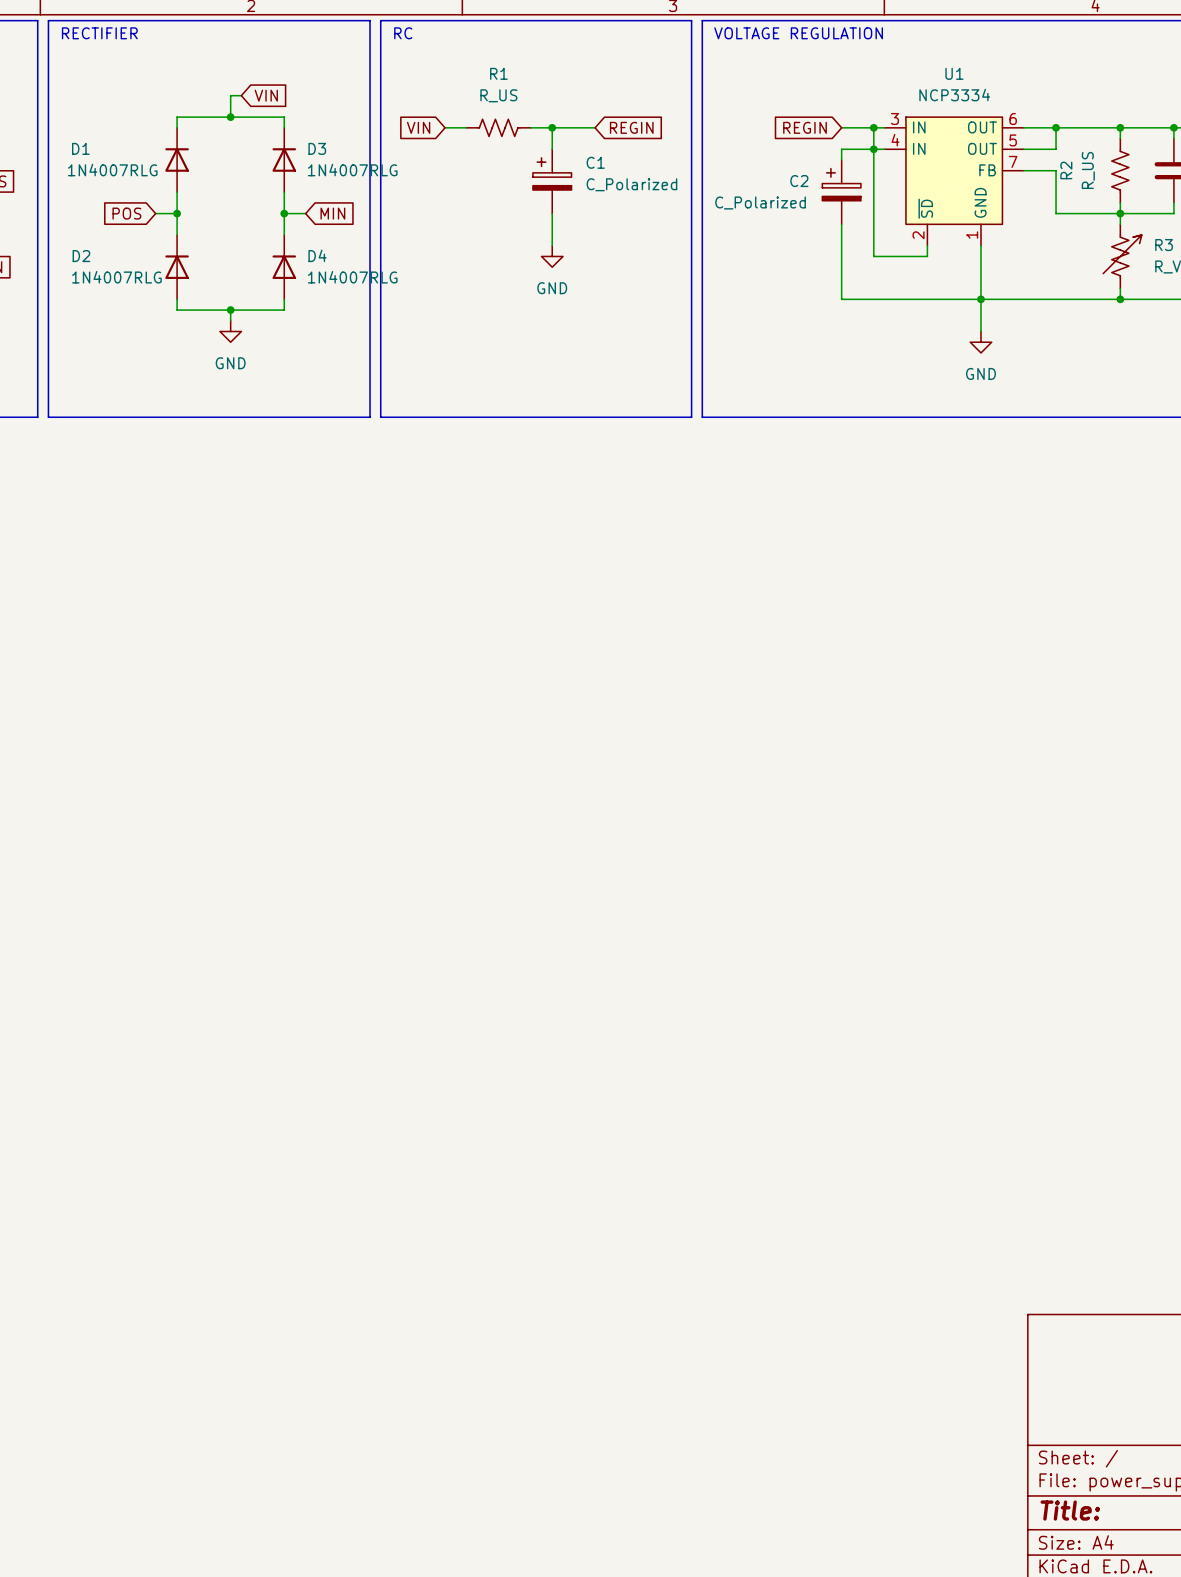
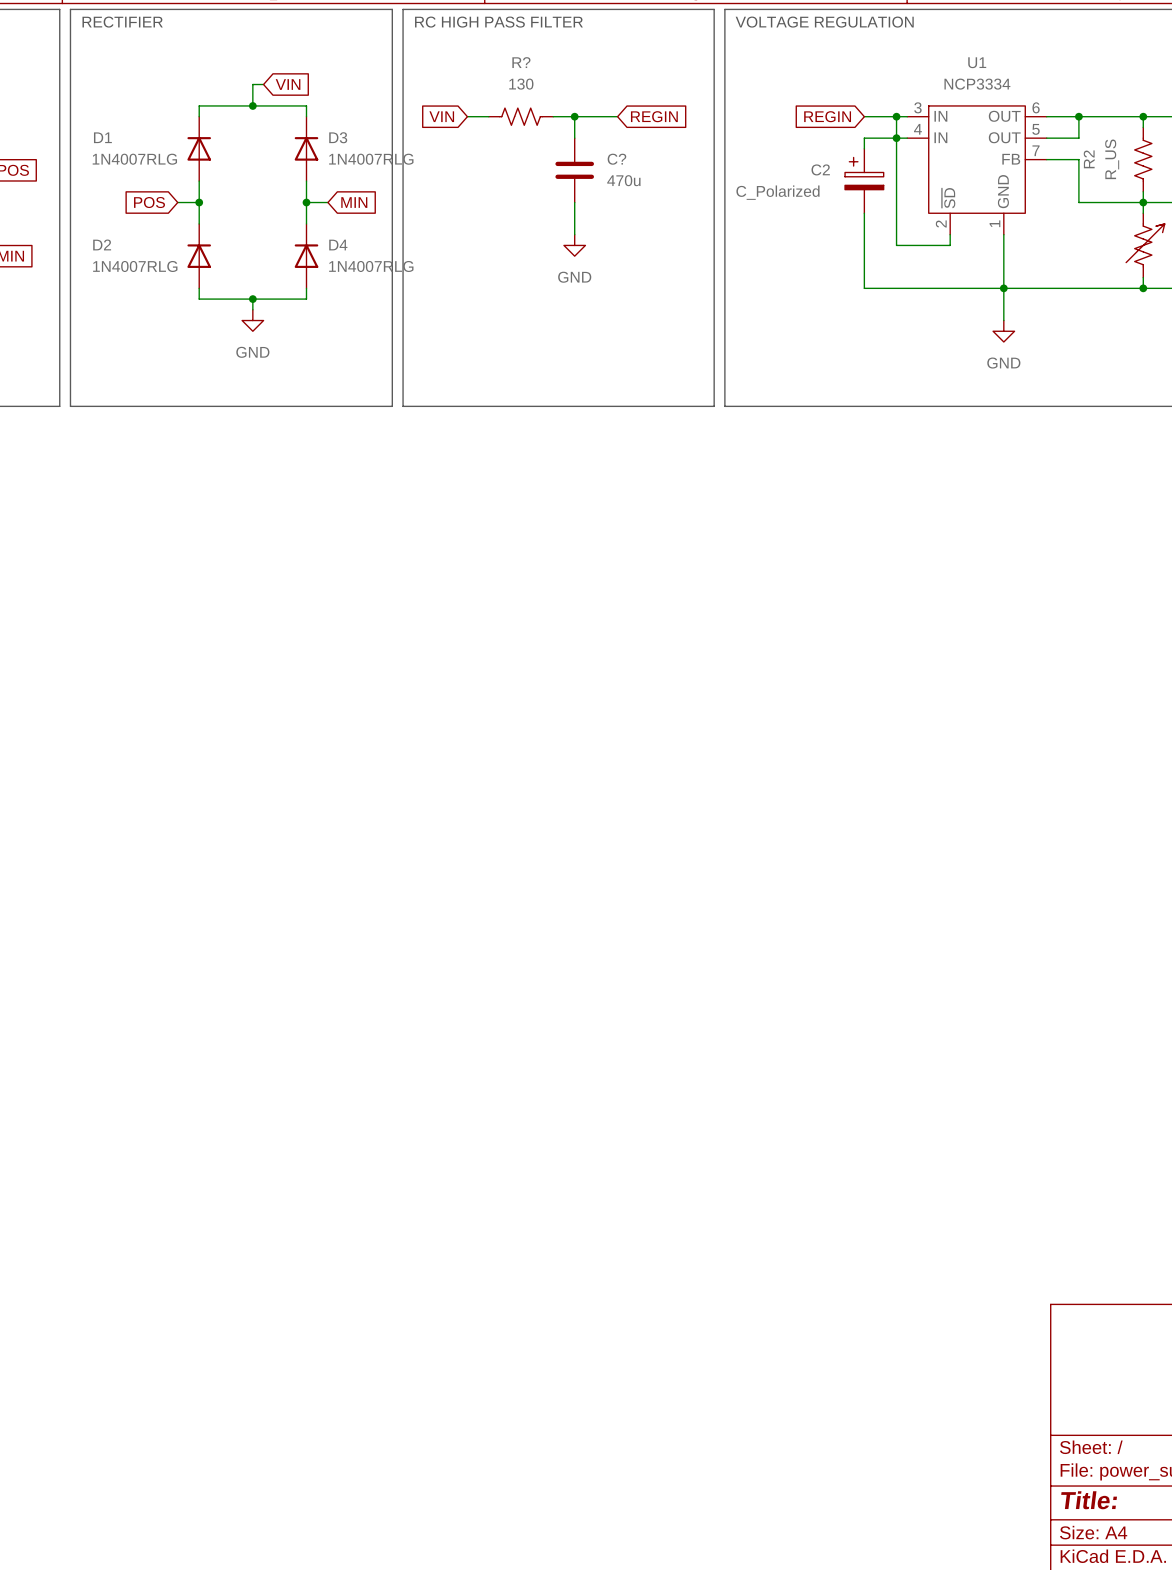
text: RC (403, 33) -> RC HIGH PASS FILTER (498, 22)
R1 name: R1 (498, 73) -> R? (521, 62)
R1 value: R_US (498, 95) -> 130 (521, 84)
C1: C_Polarized (552, 181) -> none
C?: none -> 470u (574, 170)

